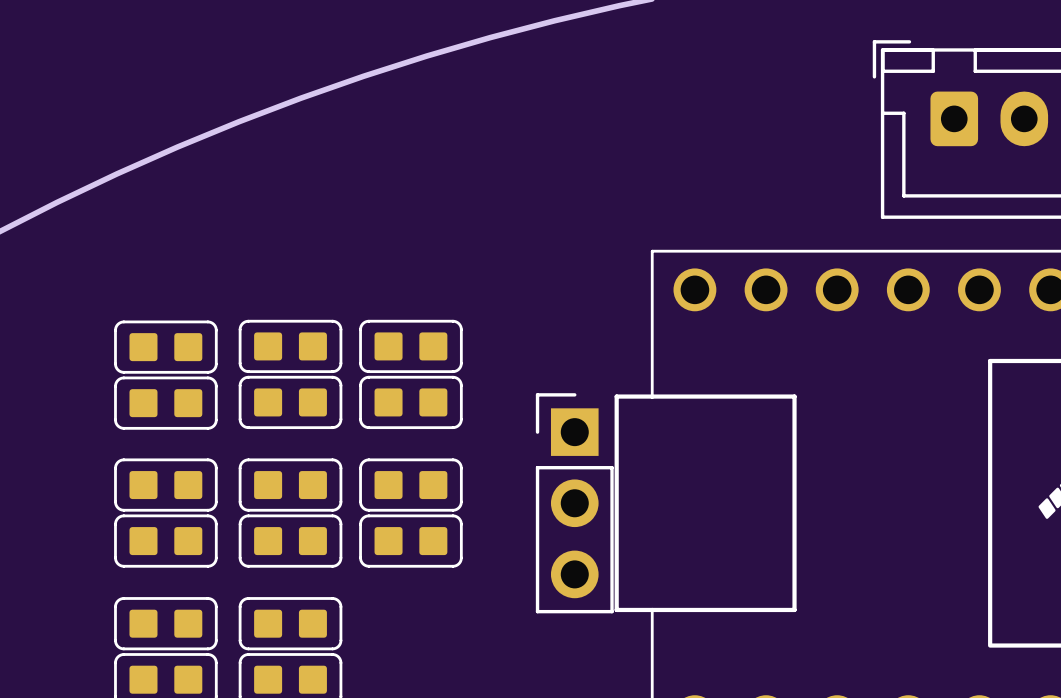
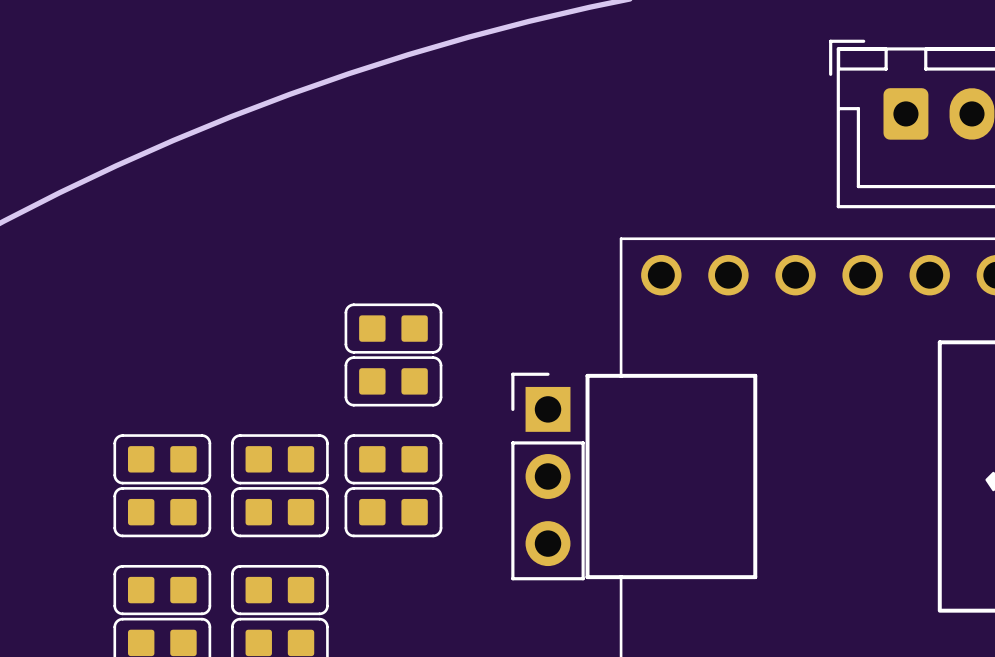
part: (290, 346) -> none
part: (165, 347) -> none
part: (290, 402) -> none
part: (165, 403) -> none

